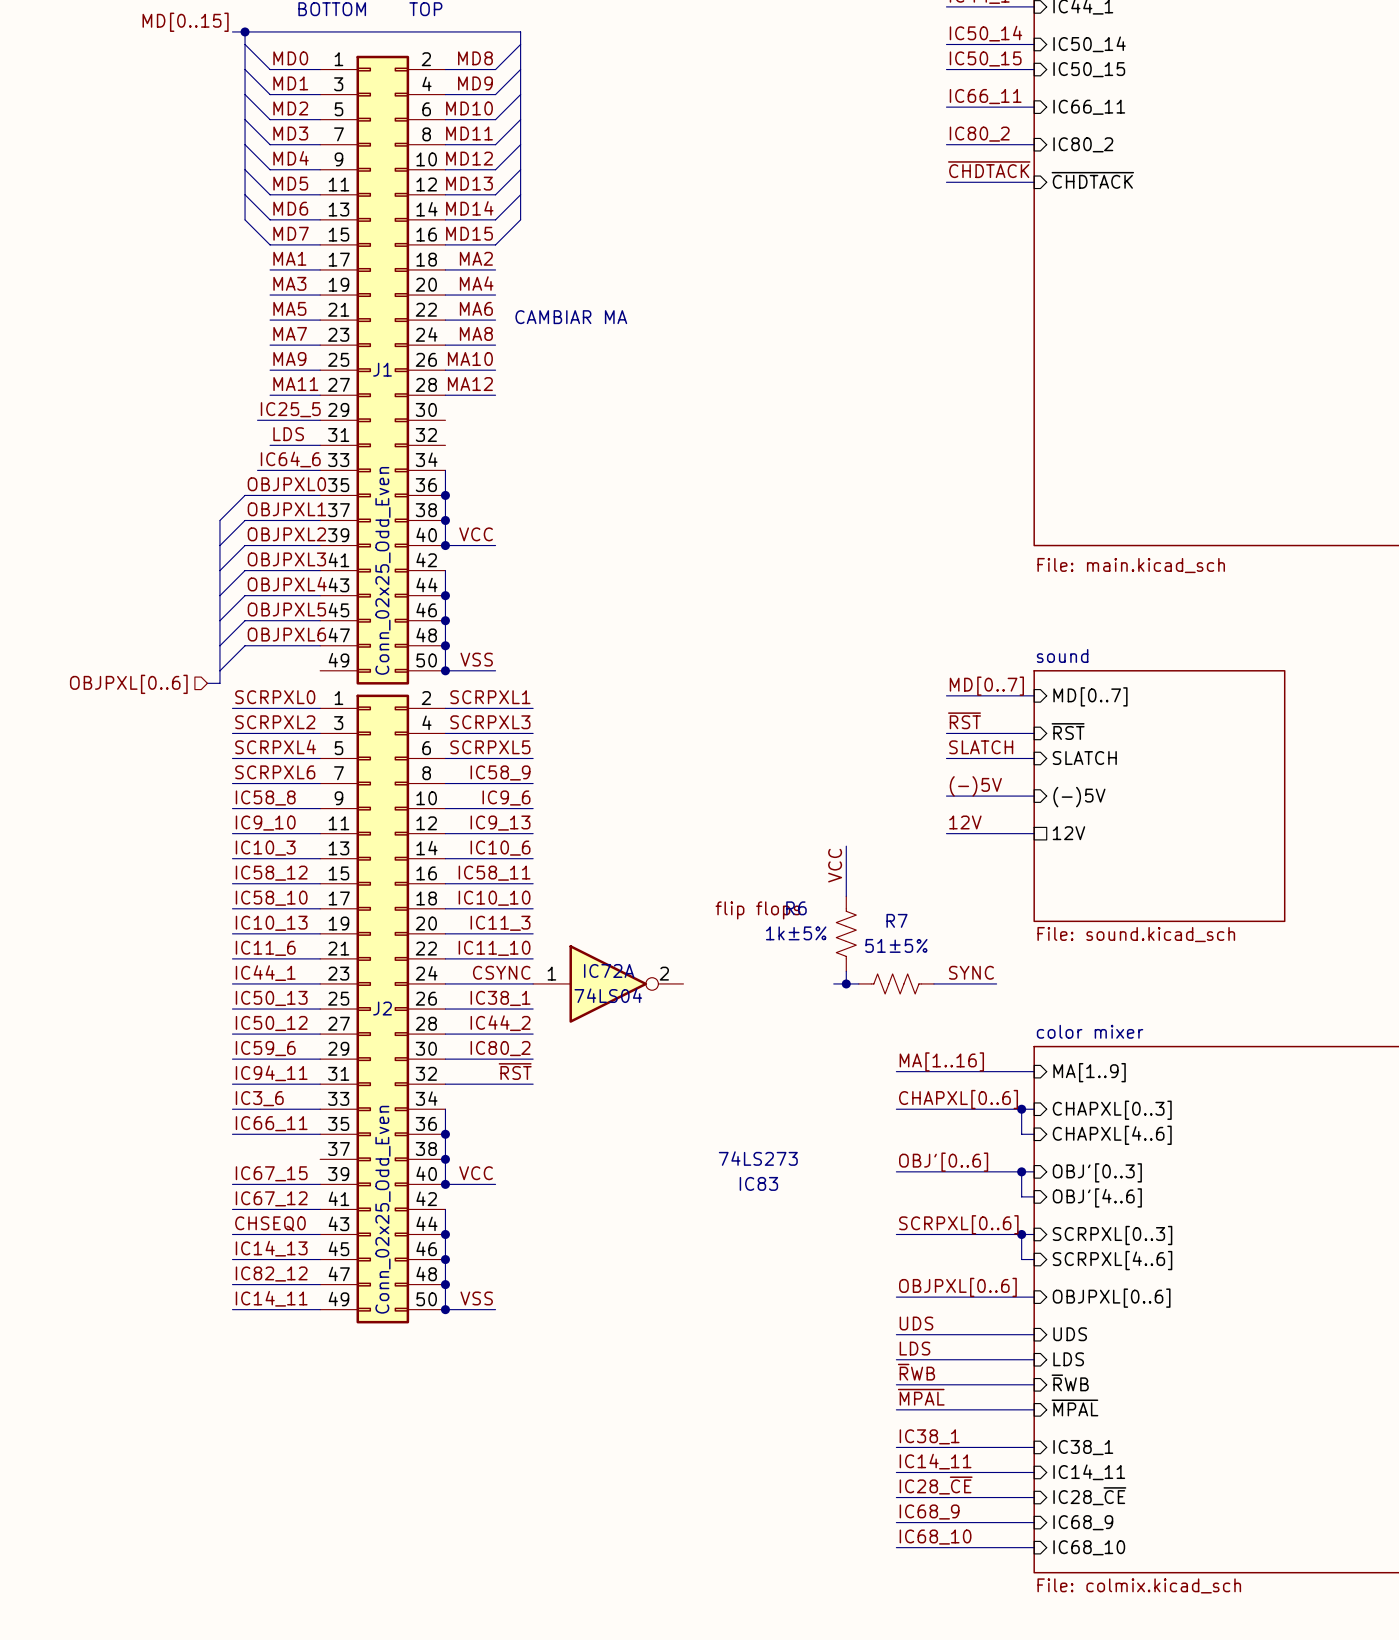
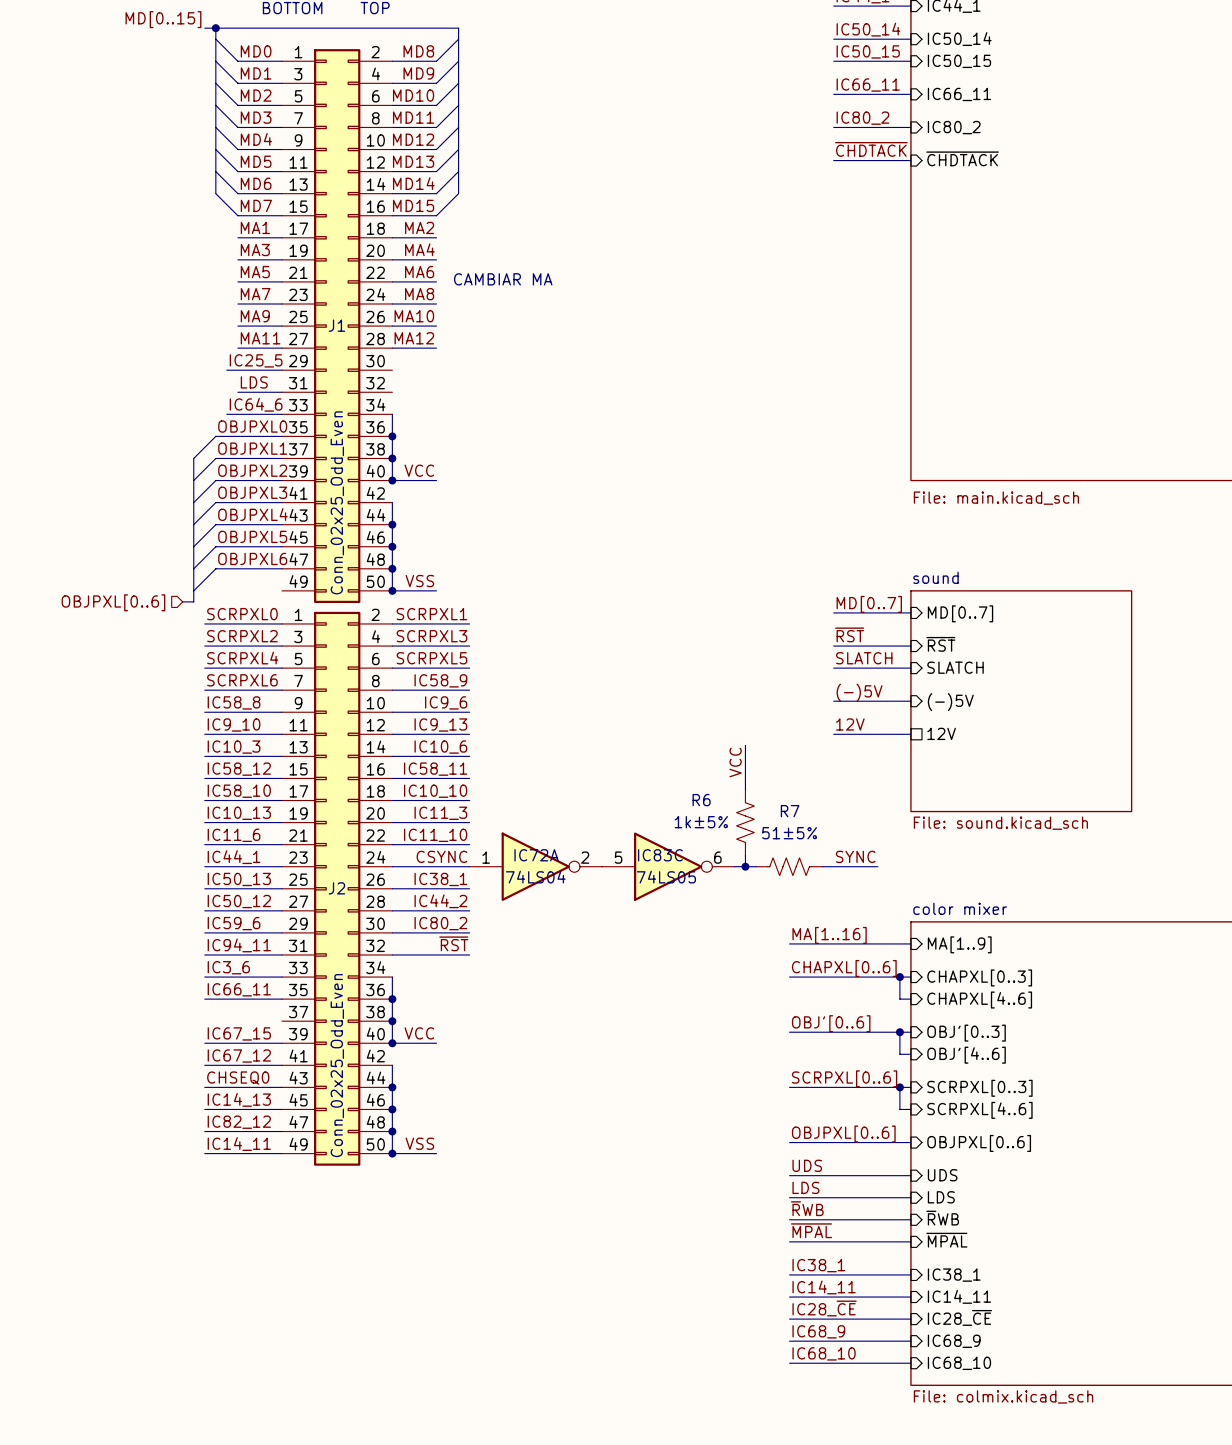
IC83C: none -> 74LS05 (668, 866)
IC83: 74LS273 (758, 1046) -> none

